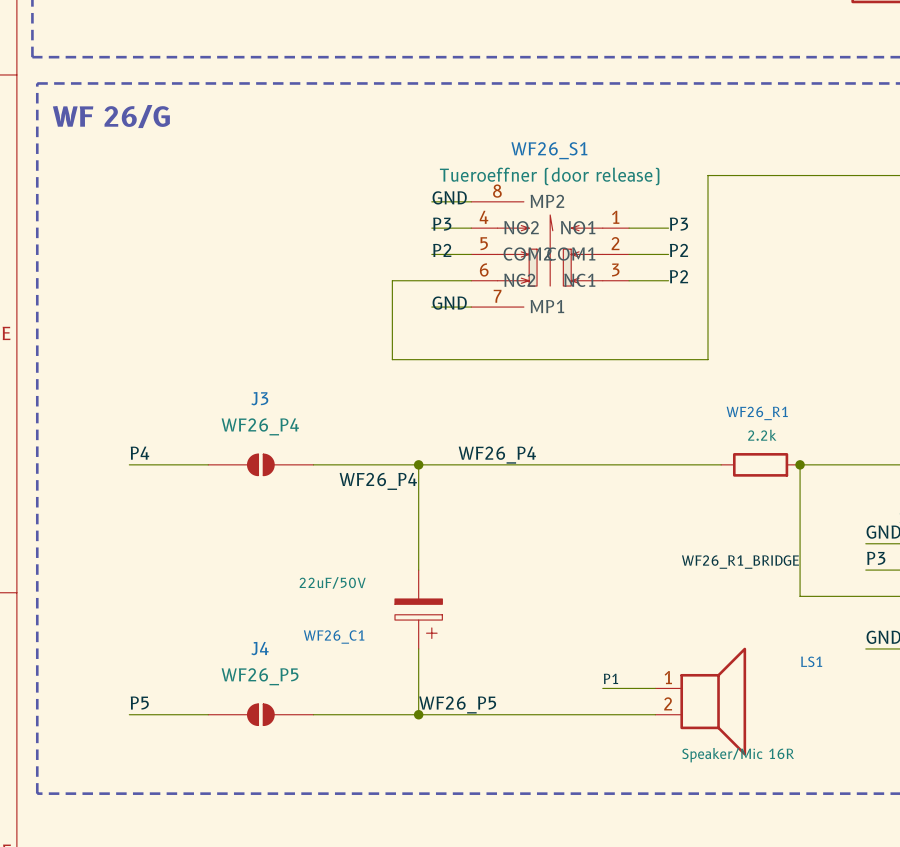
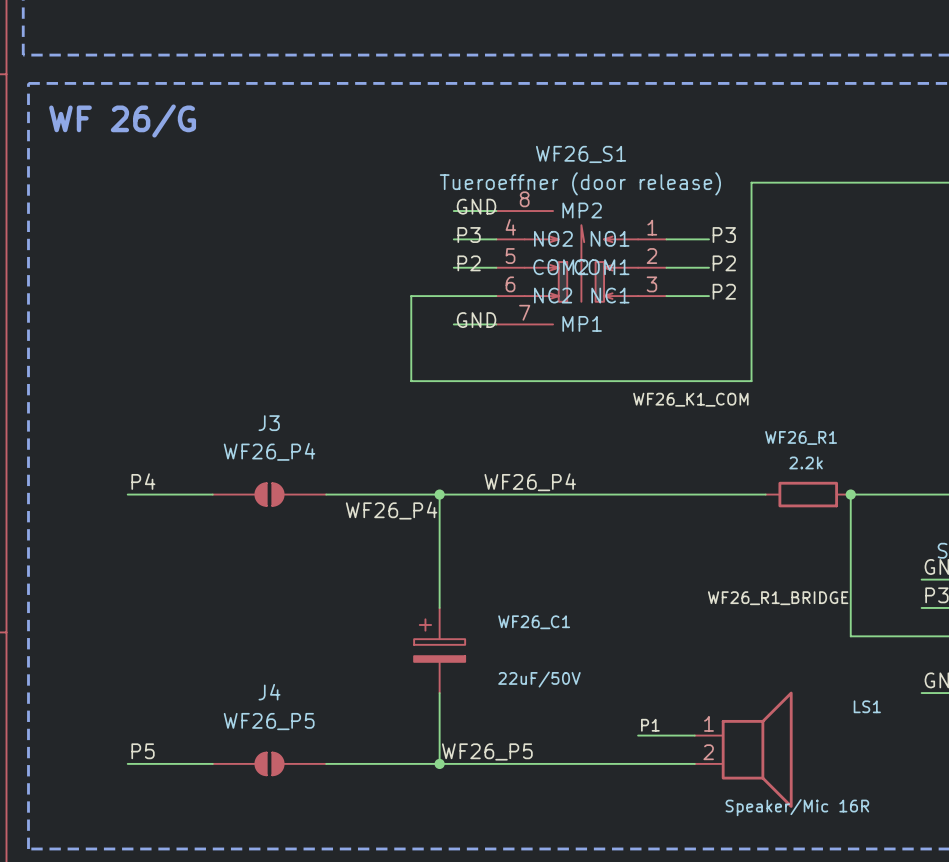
label: none -> WF26_K1_COM (690, 399)
WF26_C1 rotation: 0° (418, 618) -> 180° (439, 640)

